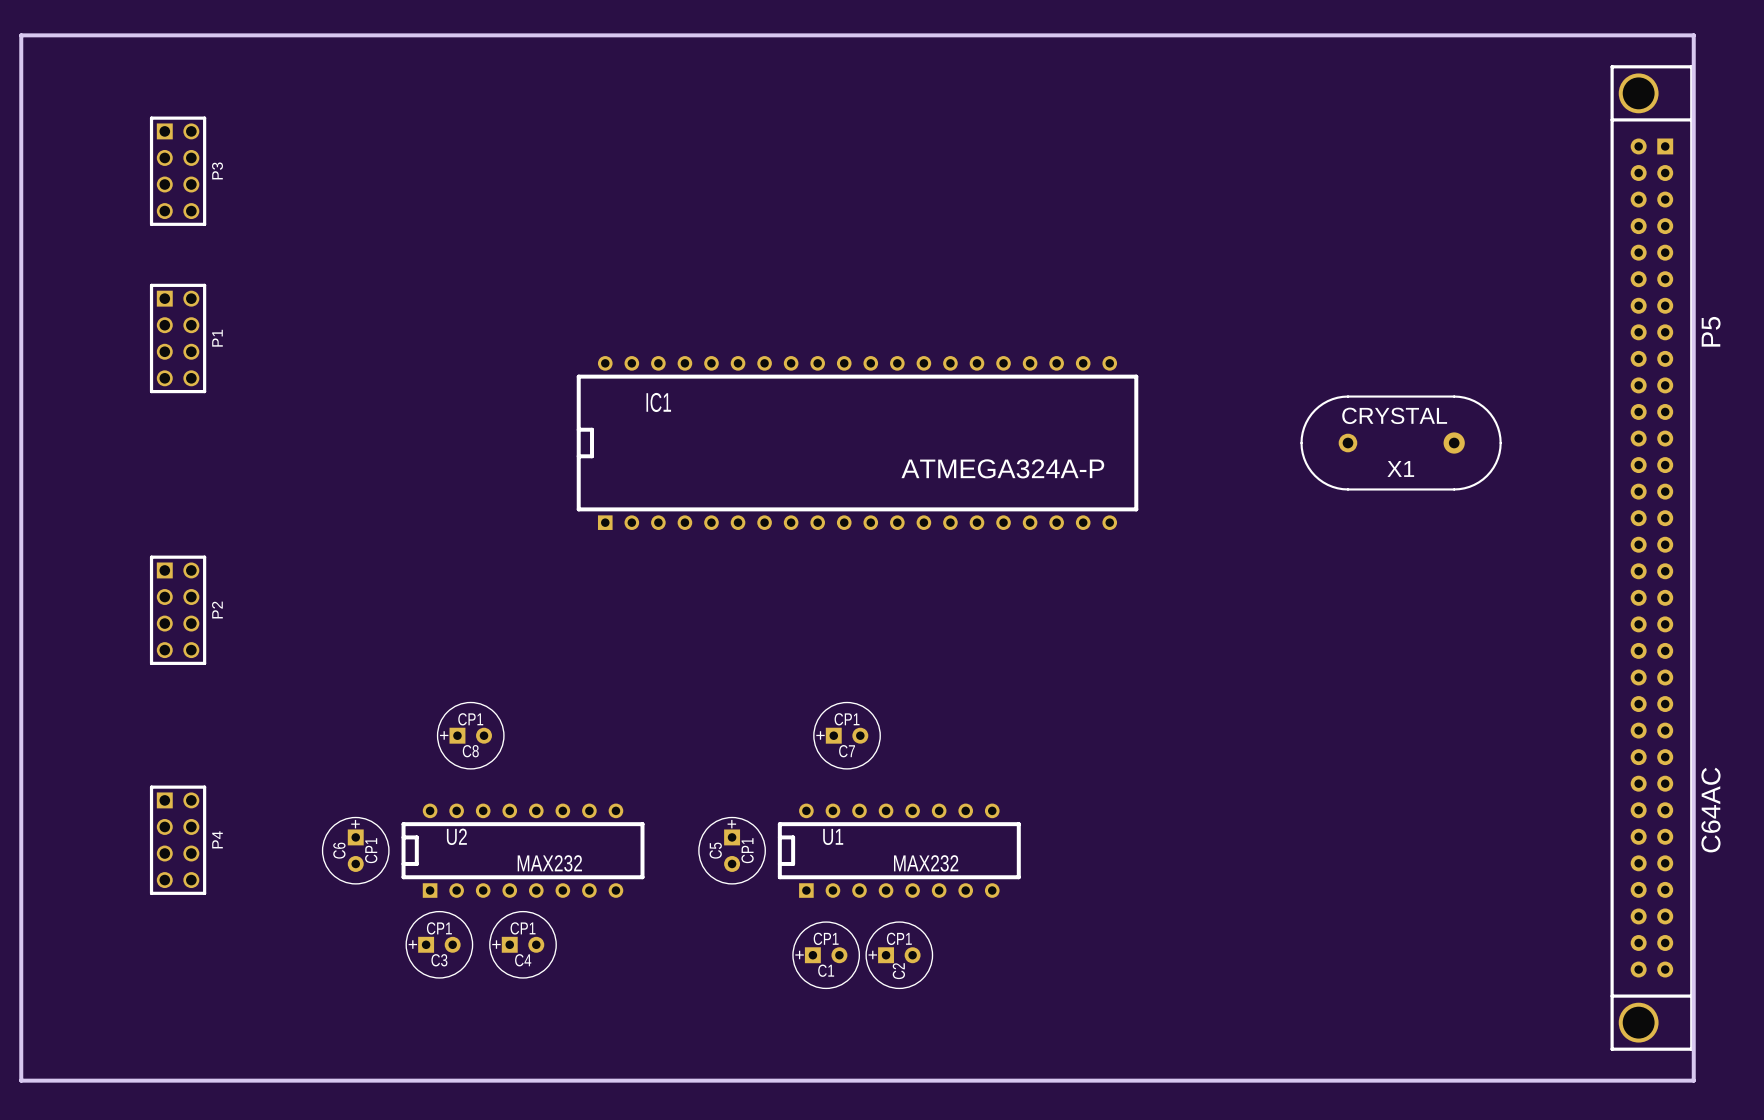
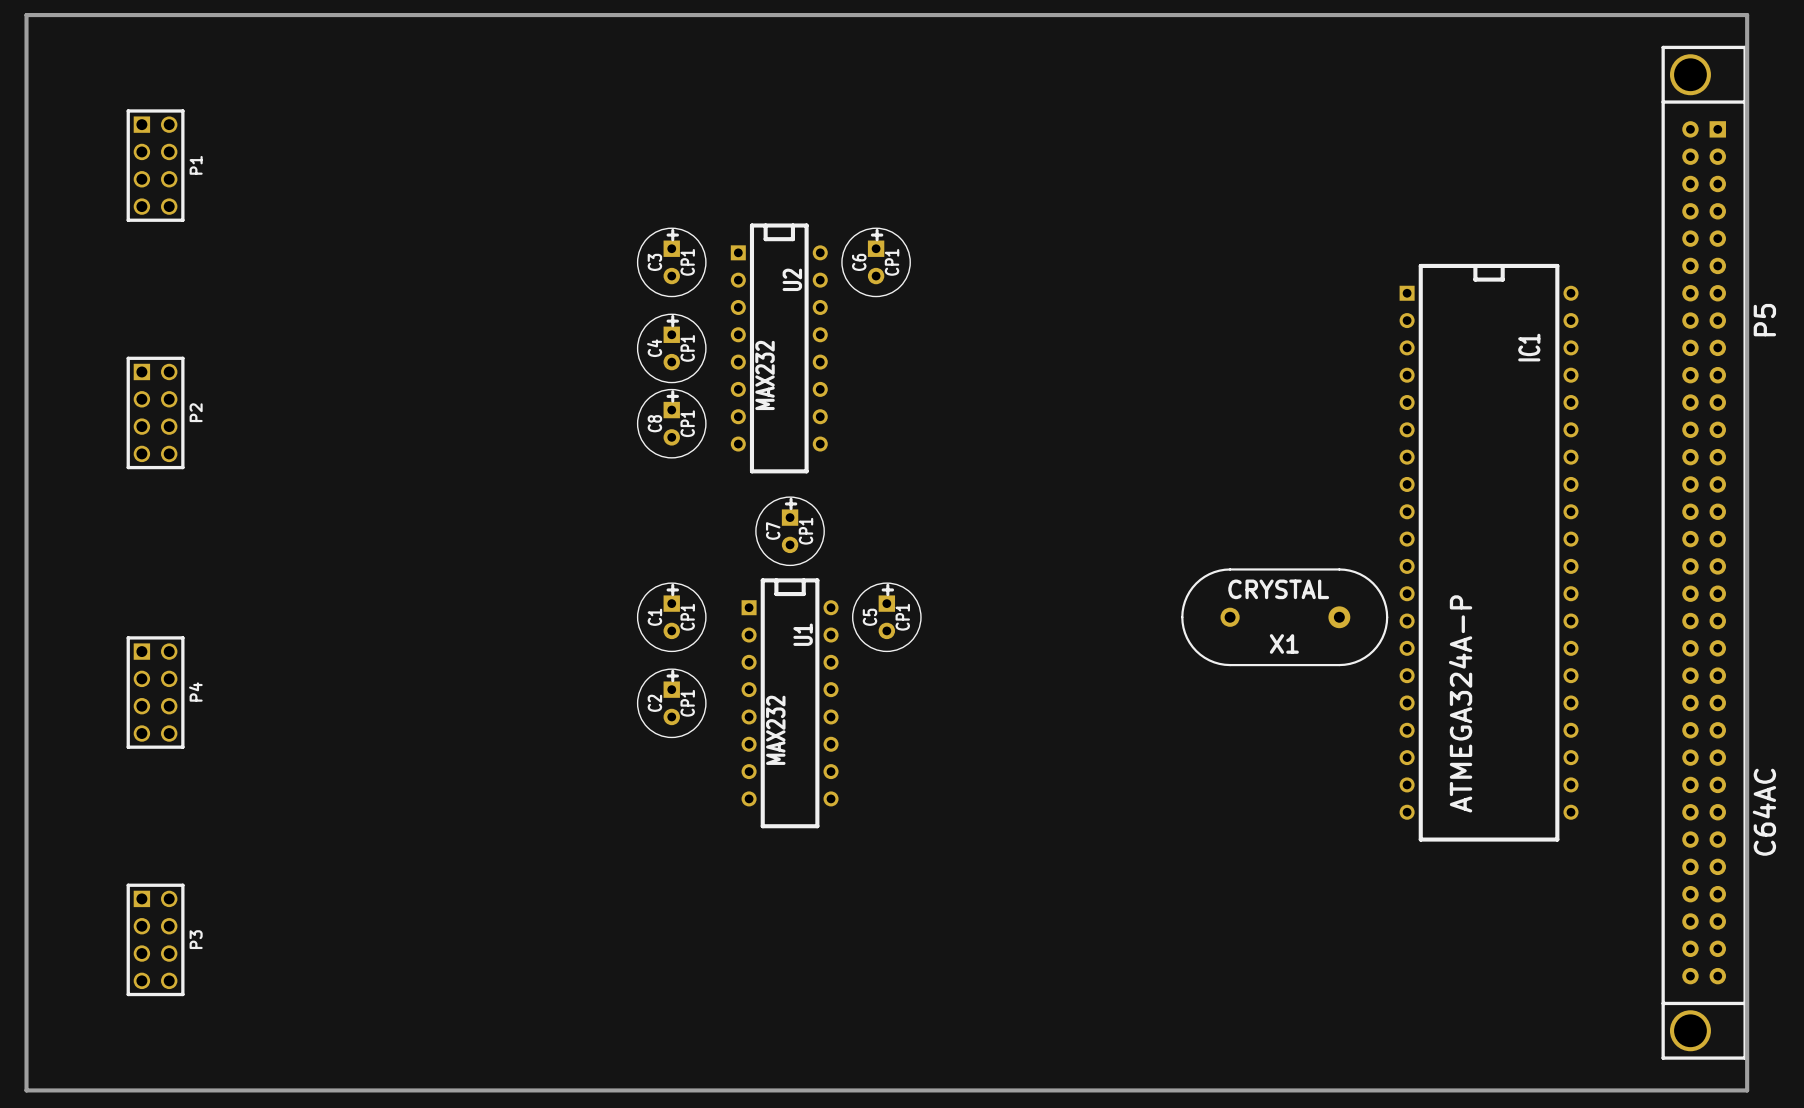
P3 position: (178, 171) -> (155, 939)
P1 position: (178, 338) -> (155, 165)
IC1 rotation: 0° (857, 443) -> 90° clockwise (1489, 552)
IC1 position: (857, 443) -> (1489, 552)
X1 position: (1401, 443) -> (1284, 617)
P2 position: (178, 610) -> (155, 412)
C8 rotation: 0° (470, 735) -> 90° clockwise (671, 423)
C8 position: (470, 735) -> (671, 423)
C7 rotation: 0° (847, 735) -> 90° clockwise (790, 531)
C7 position: (847, 735) -> (790, 531)
P4 position: (178, 840) -> (155, 692)
C6 position: (355, 850) -> (876, 262)
U2 rotation: 0° (523, 850) -> 90° clockwise (779, 348)
U2 position: (523, 850) -> (779, 348)
C5 position: (732, 850) -> (886, 617)
U1 rotation: 0° (899, 850) -> 90° clockwise (790, 703)
U1 position: (899, 850) -> (790, 703)
C3 rotation: 0° (439, 944) -> 90° clockwise (671, 262)
C3 position: (439, 944) -> (671, 262)
C4 rotation: 0° (523, 944) -> 90° clockwise (671, 348)
C4 position: (523, 944) -> (671, 348)
C1 rotation: 0° (826, 955) -> 90° clockwise (671, 617)
C1 position: (826, 955) -> (671, 617)
C2 rotation: 0° (899, 955) -> 90° clockwise (671, 703)
C2 position: (899, 955) -> (671, 703)

